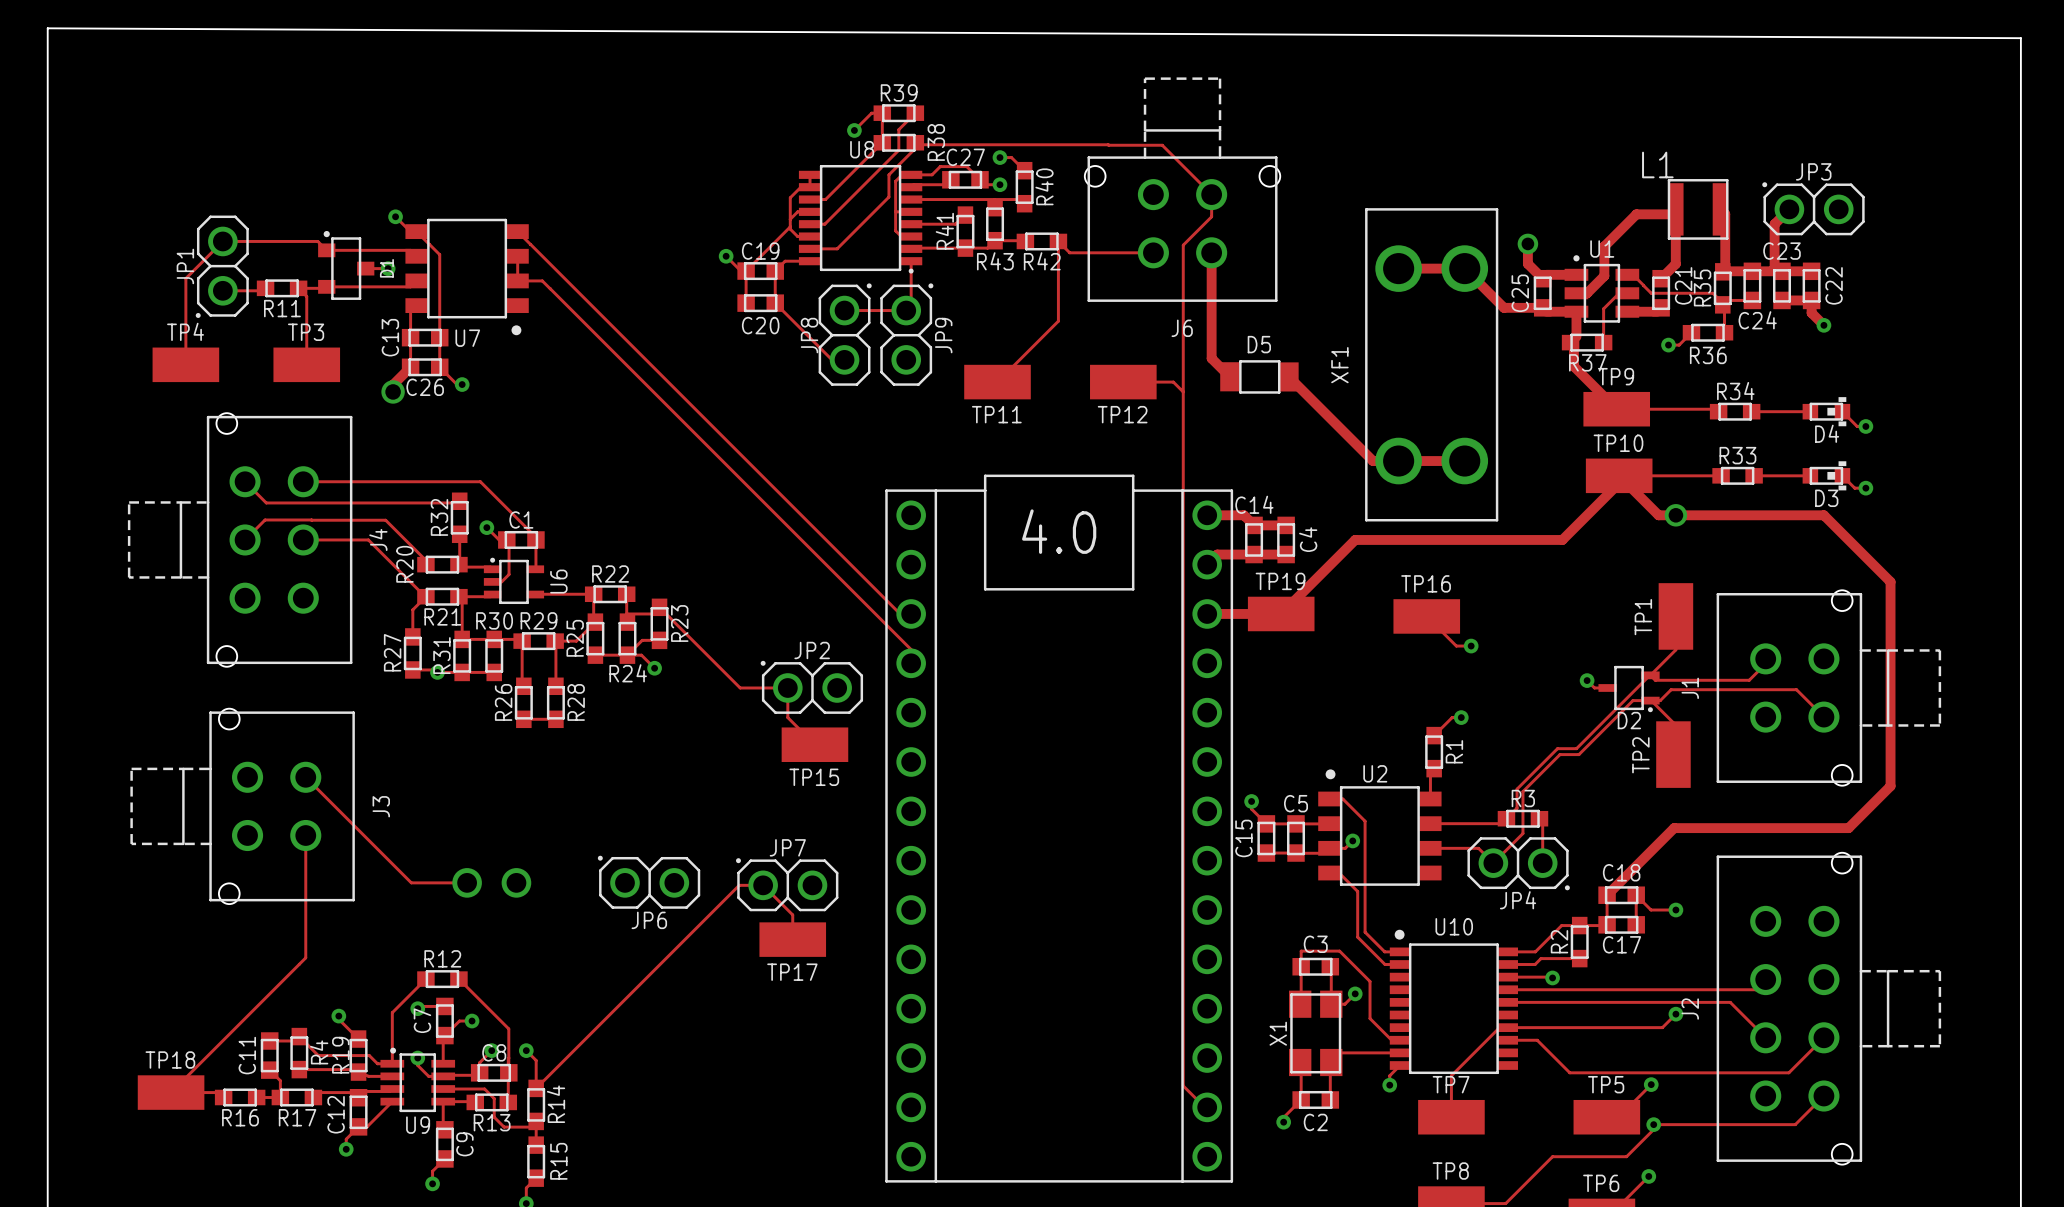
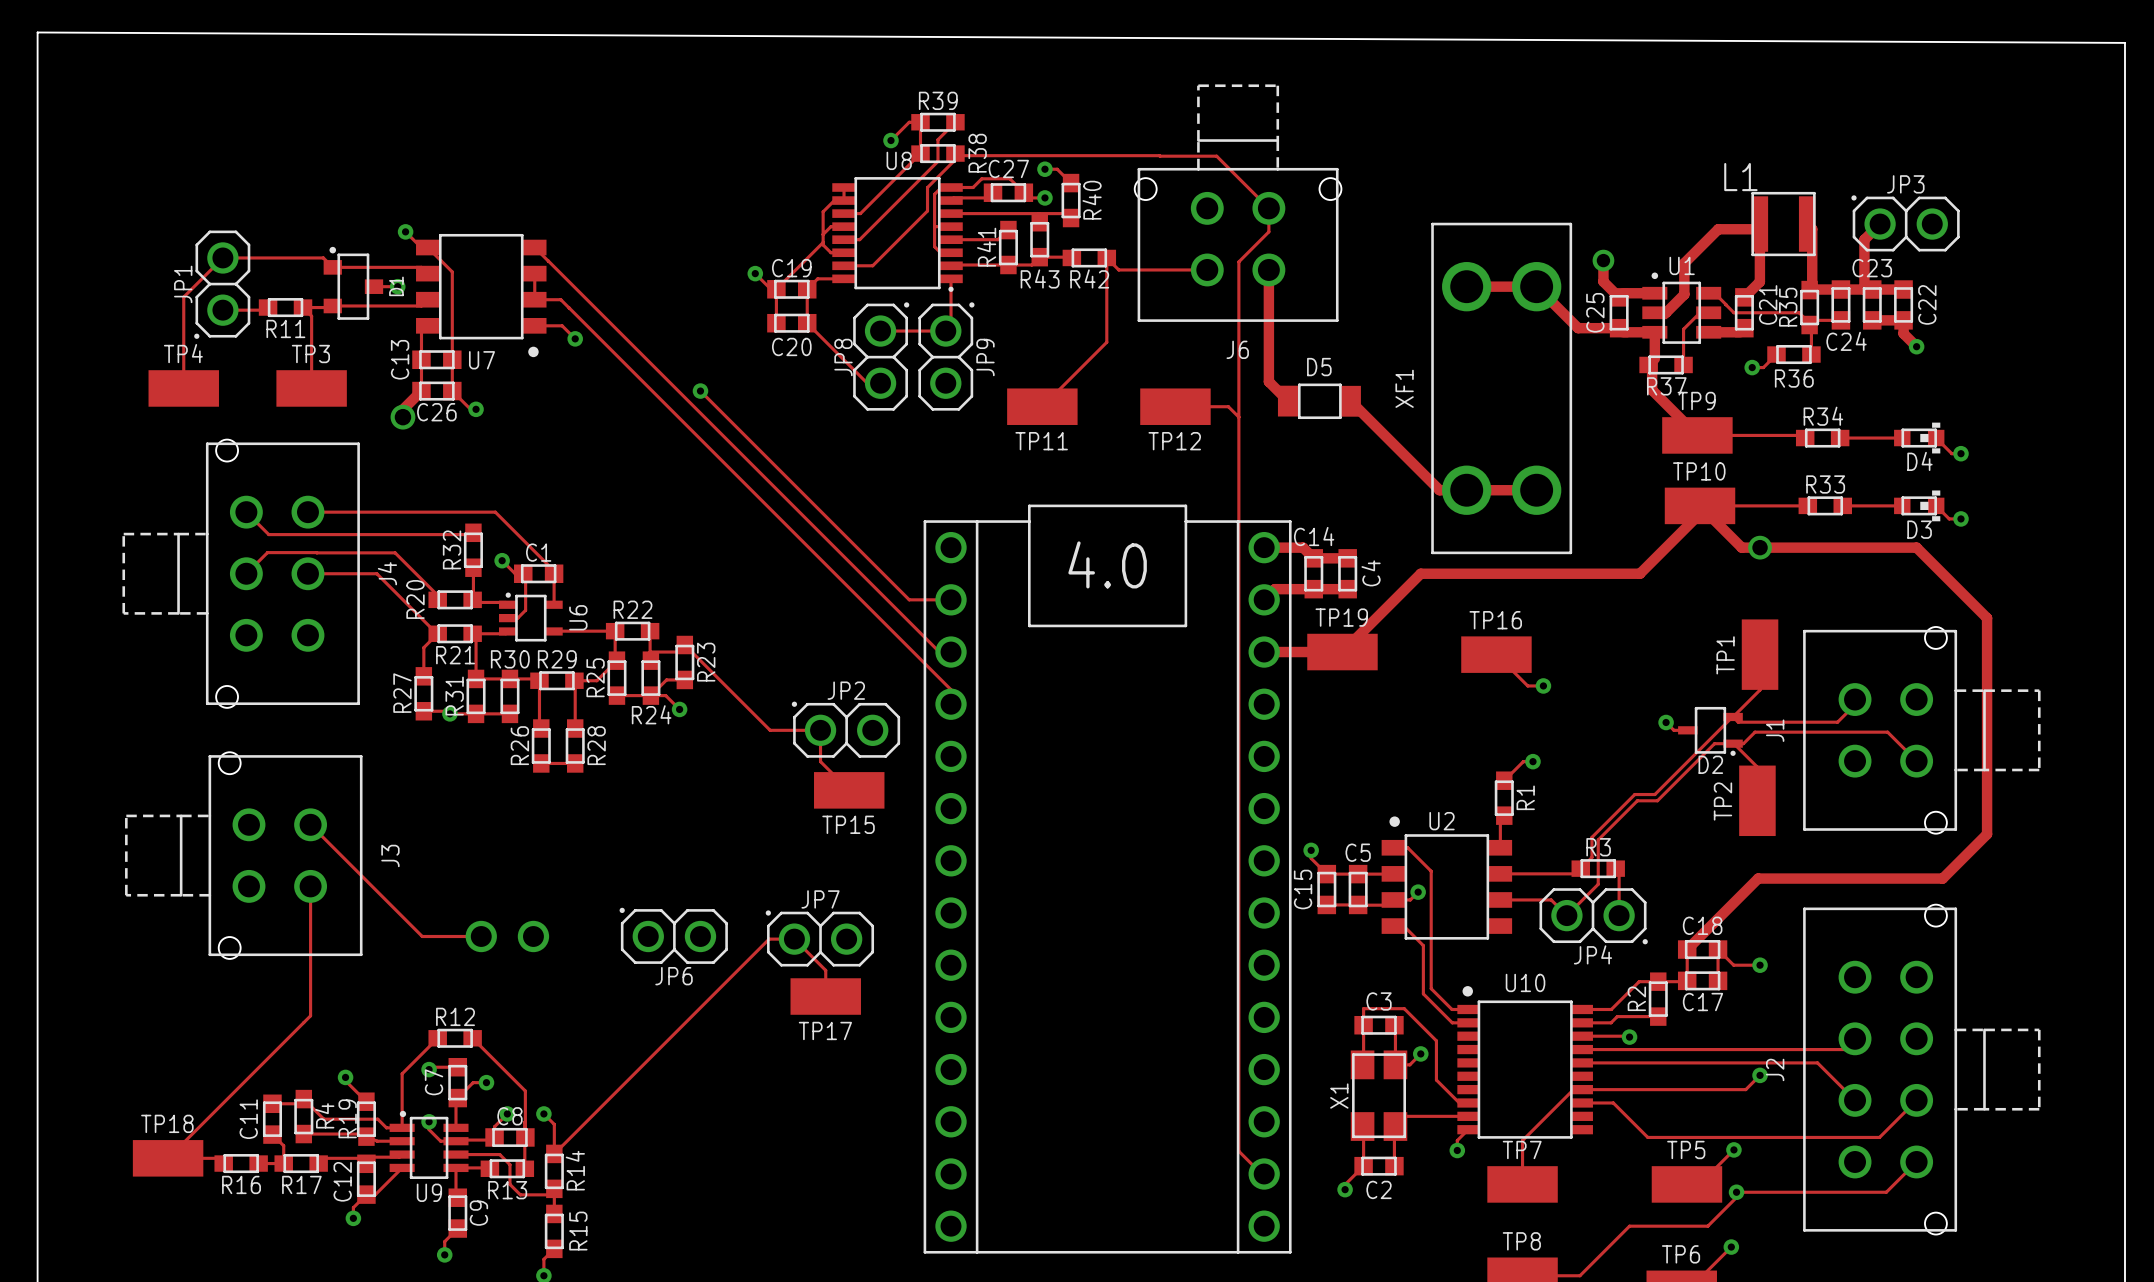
track: none -> (534, 325) (562, 325) (575, 338)
via: none -> (575, 338)
track: none -> (700, 391) (909, 599) (951, 599)
via: none -> (700, 391)

